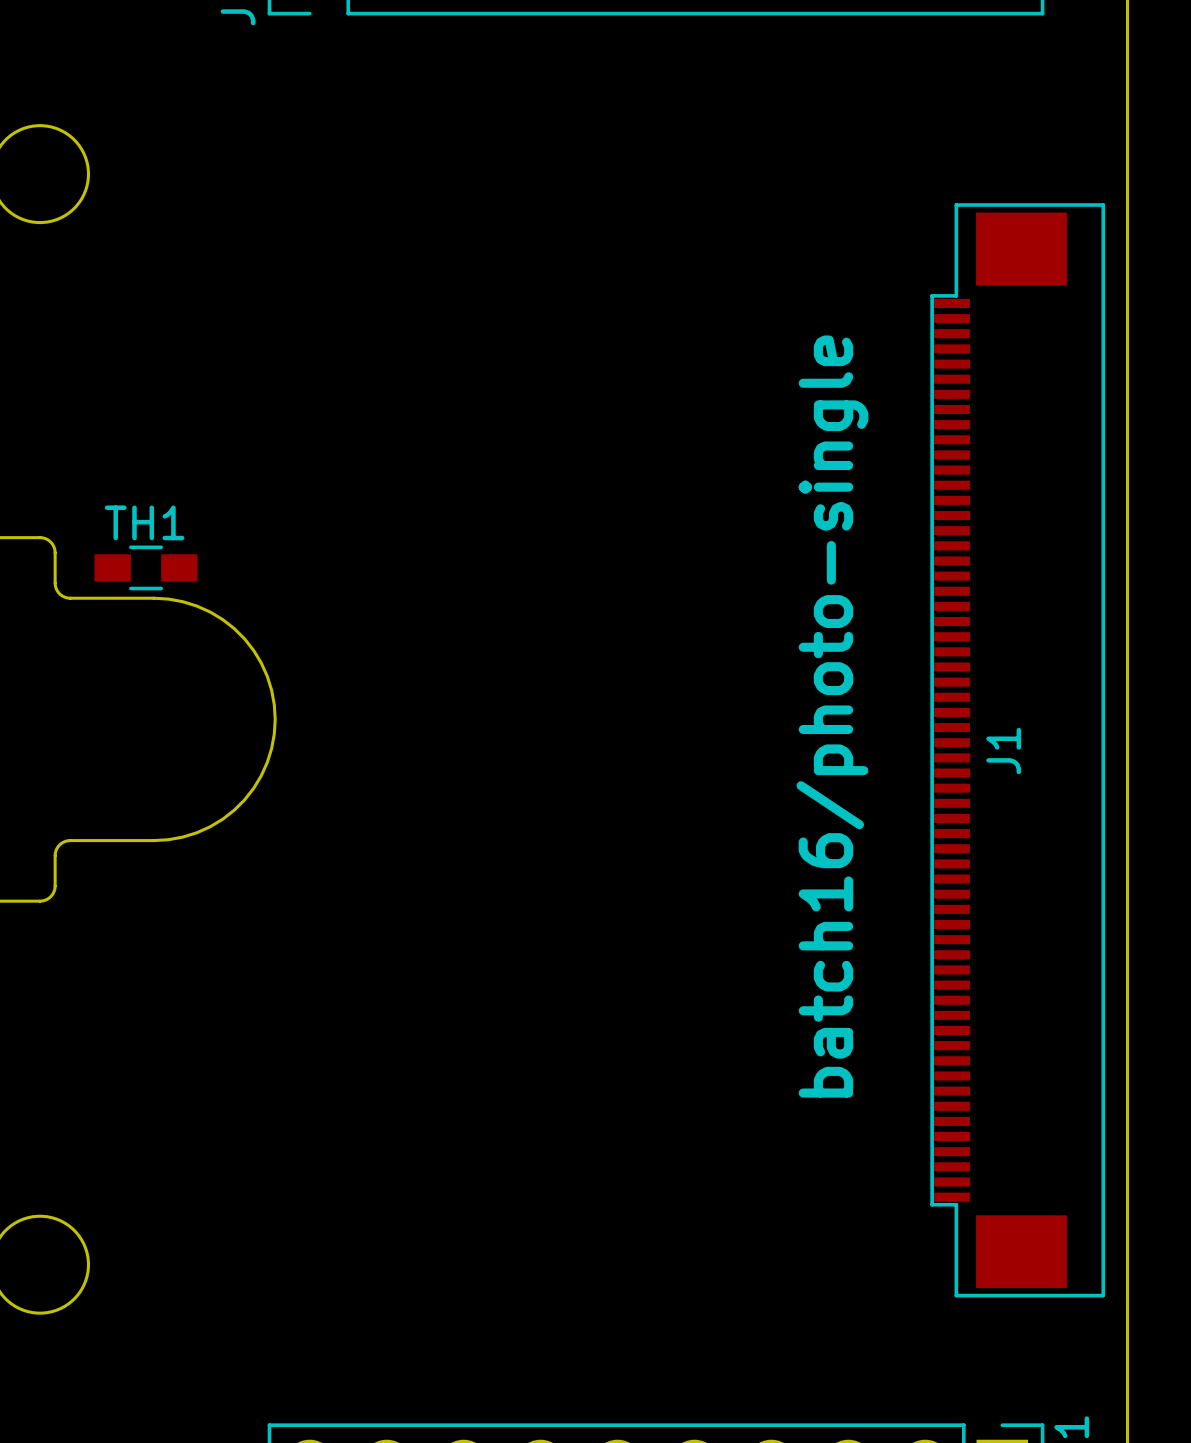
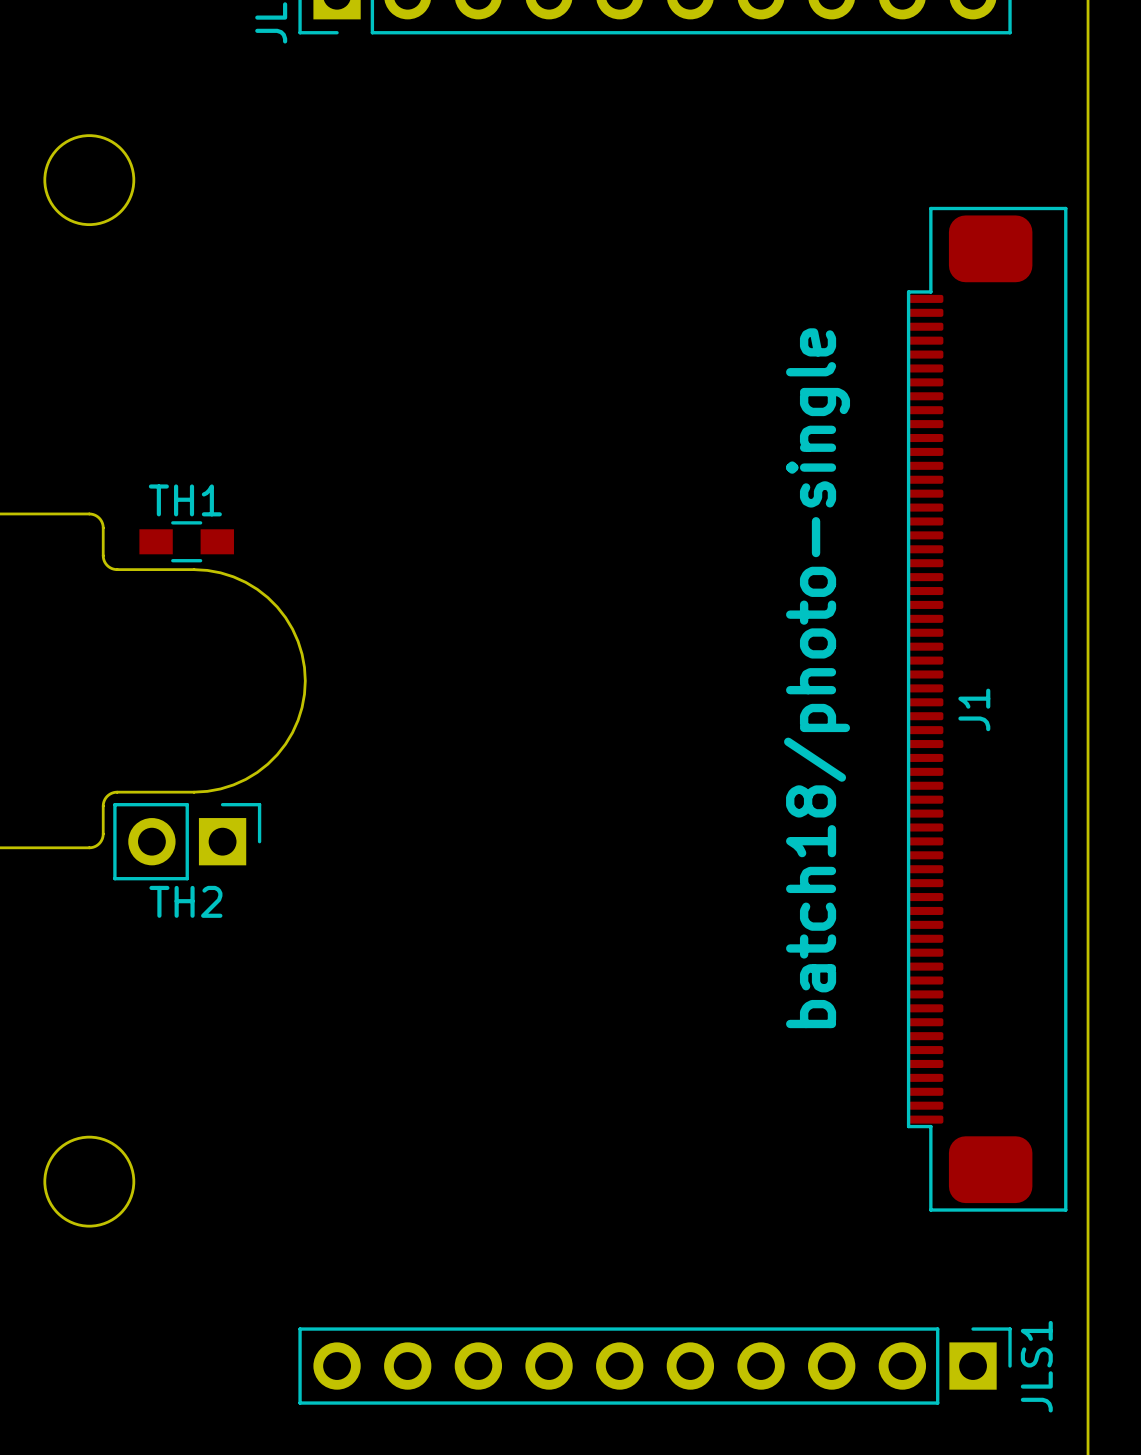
J1 footprint: [930, 203, 1106, 1298] -> [906, 206, 1068, 1212]
text: batch16/photo-single (832, 716) -> batch18/photo-single (817, 678)
TH2: none -> (187, 841)

